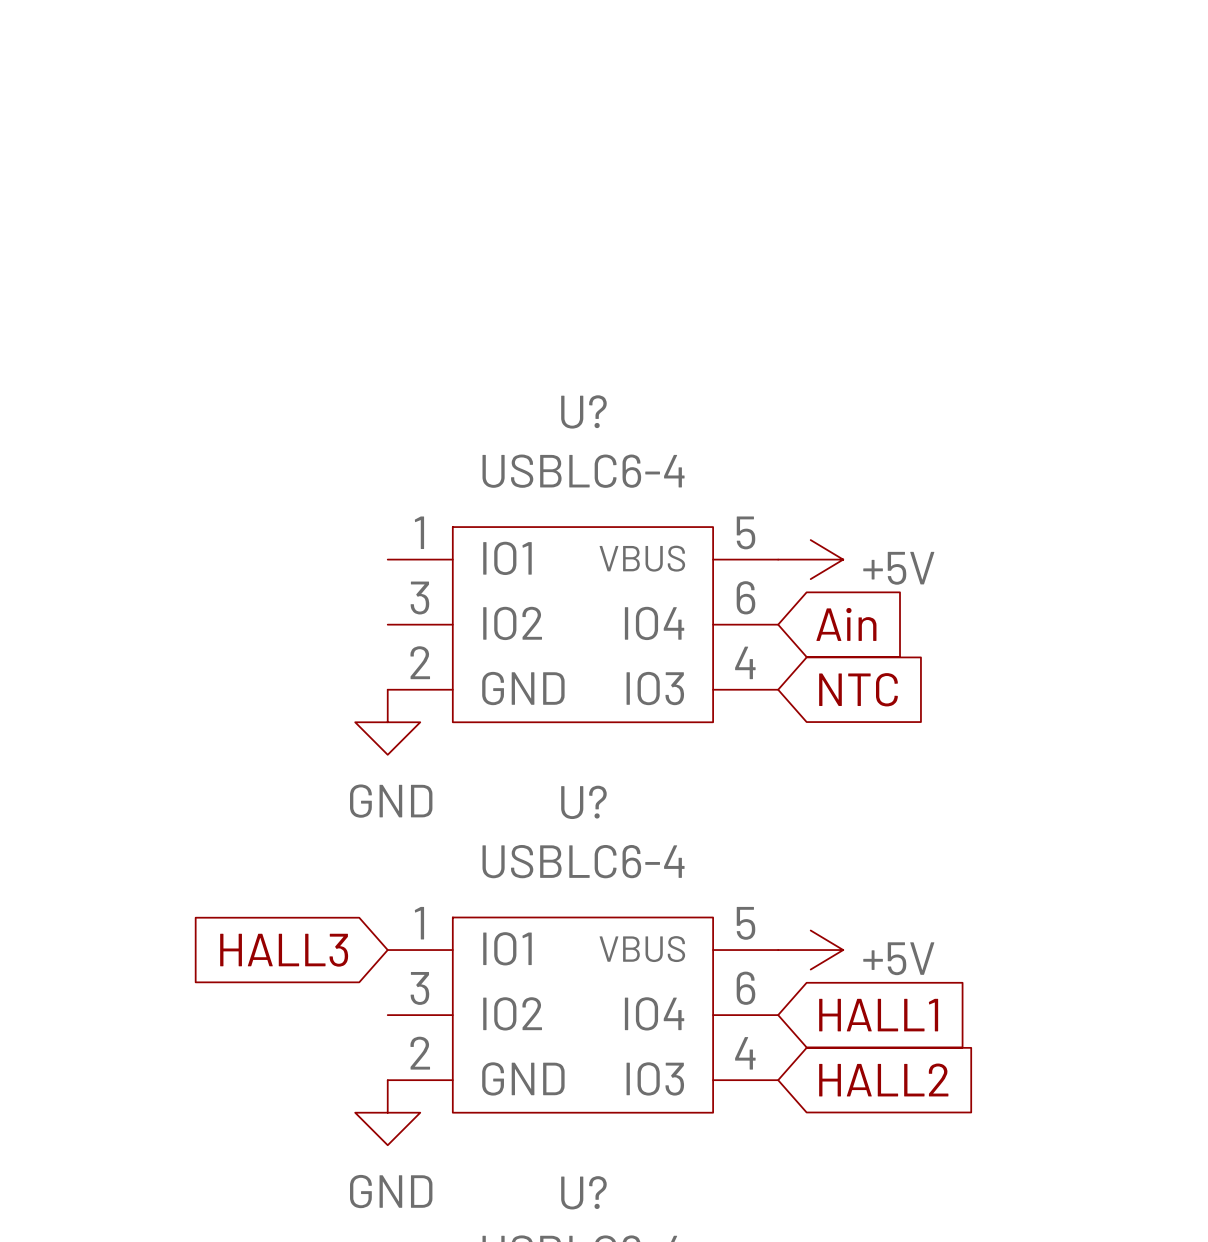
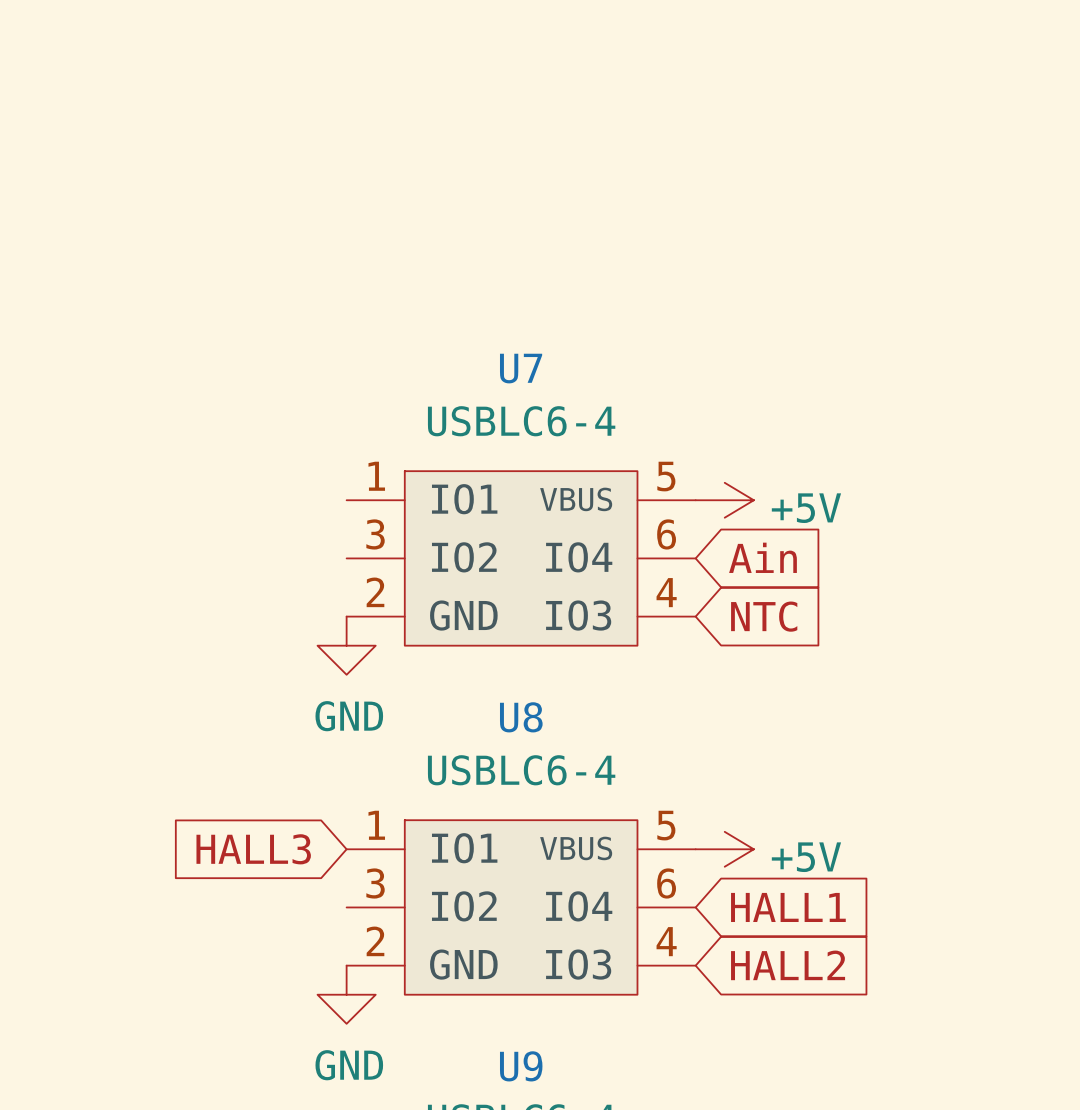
U? name: U? (583, 411) -> U7 (521, 368)
U? name: U? (583, 802) -> U8 (521, 717)
U? name: U? (583, 1192) -> U9 (521, 1066)

